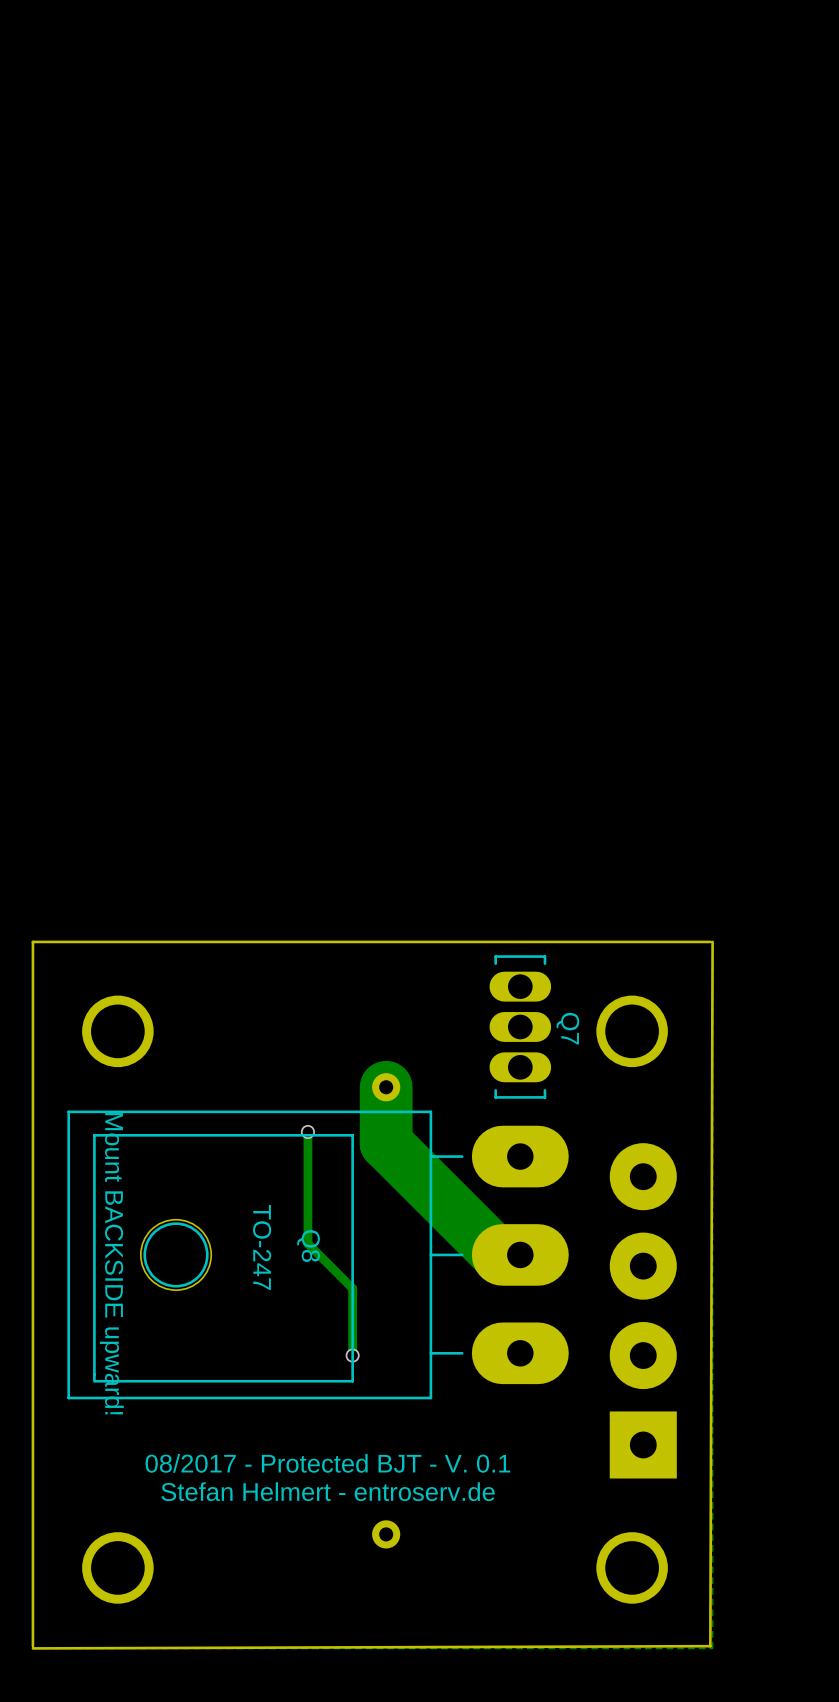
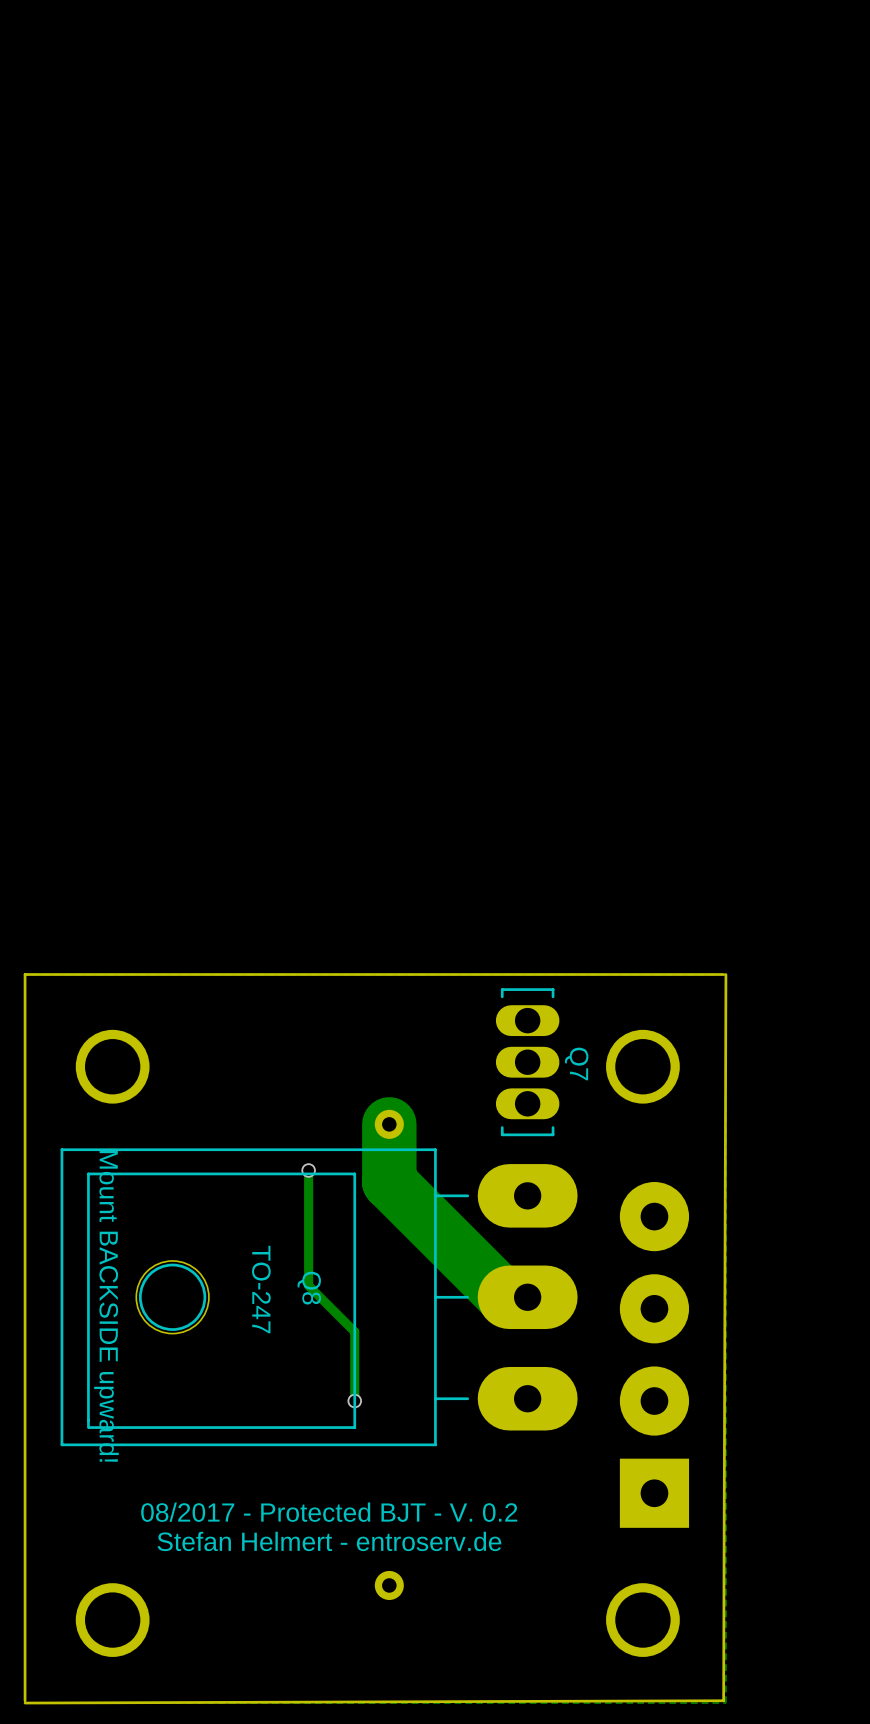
text: 08/2017 - Protected BJT - V. 0.1 (327, 1463) -> 08/2017 - Protected BJT - V. 0.2 (329, 1512)

